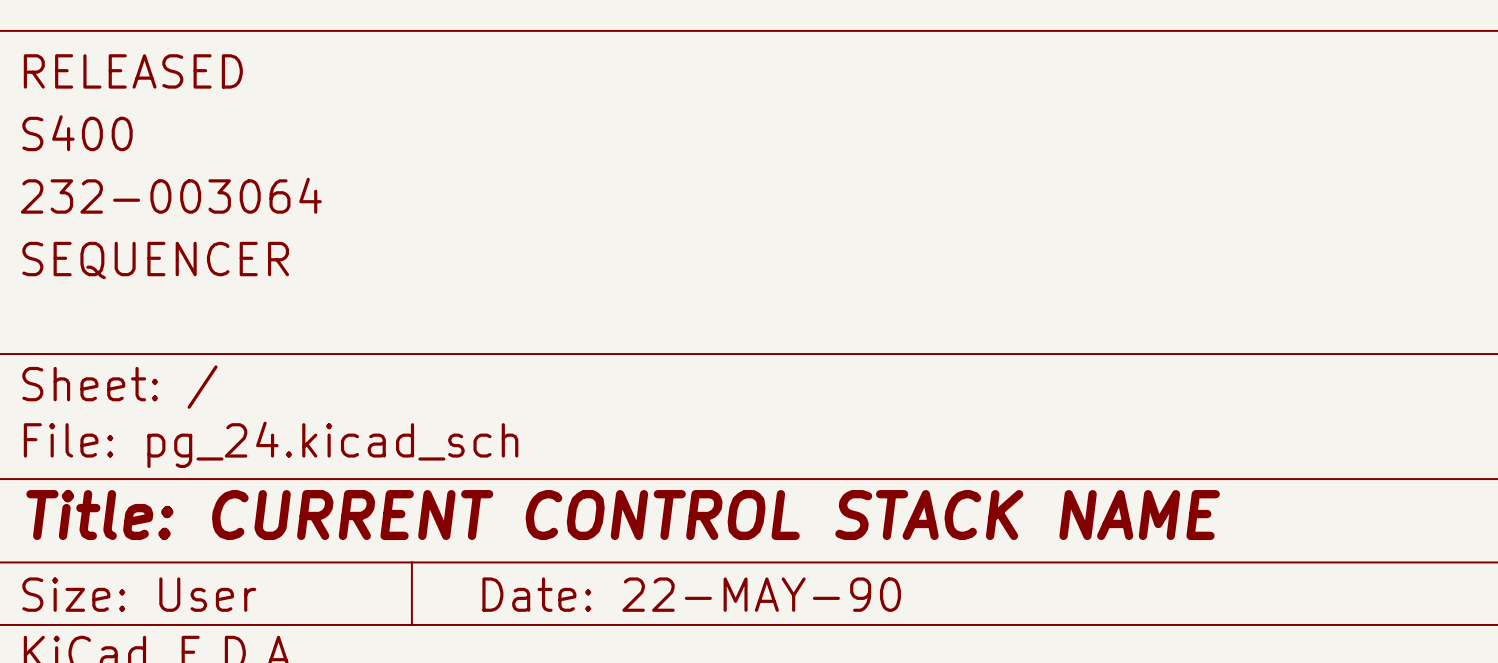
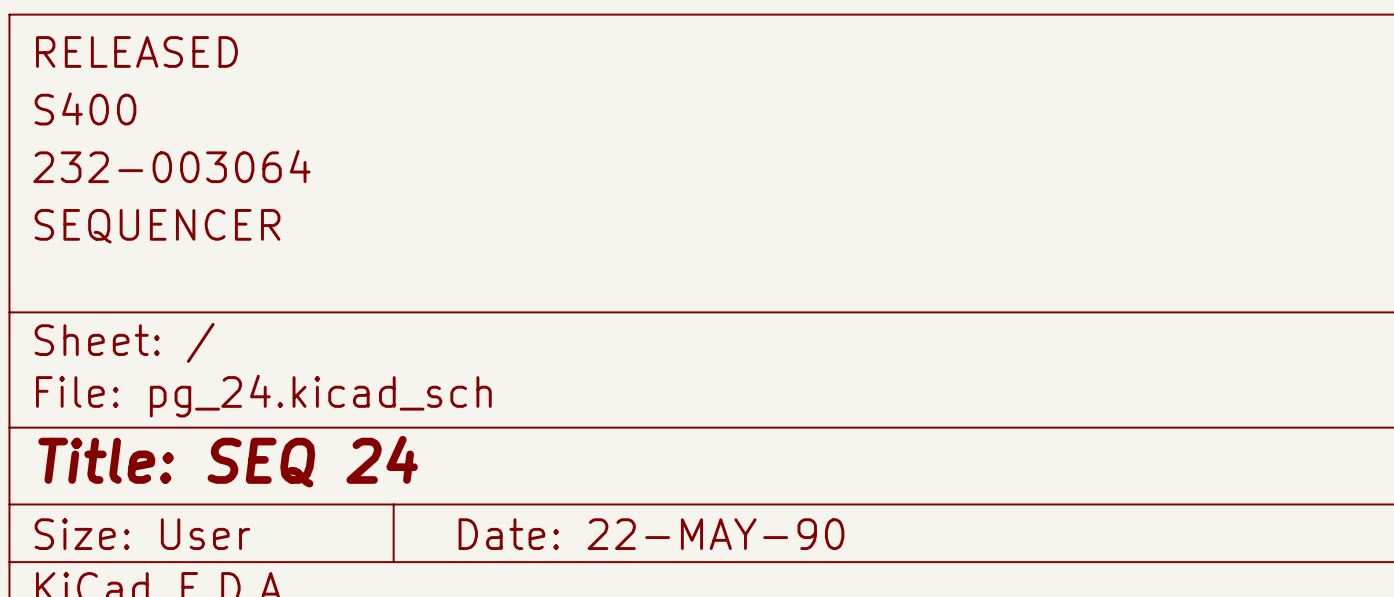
title block: Title: CURRENT CONTROL STACK NAME (623, 515) -> Title: SEQ 24 (228, 461)

